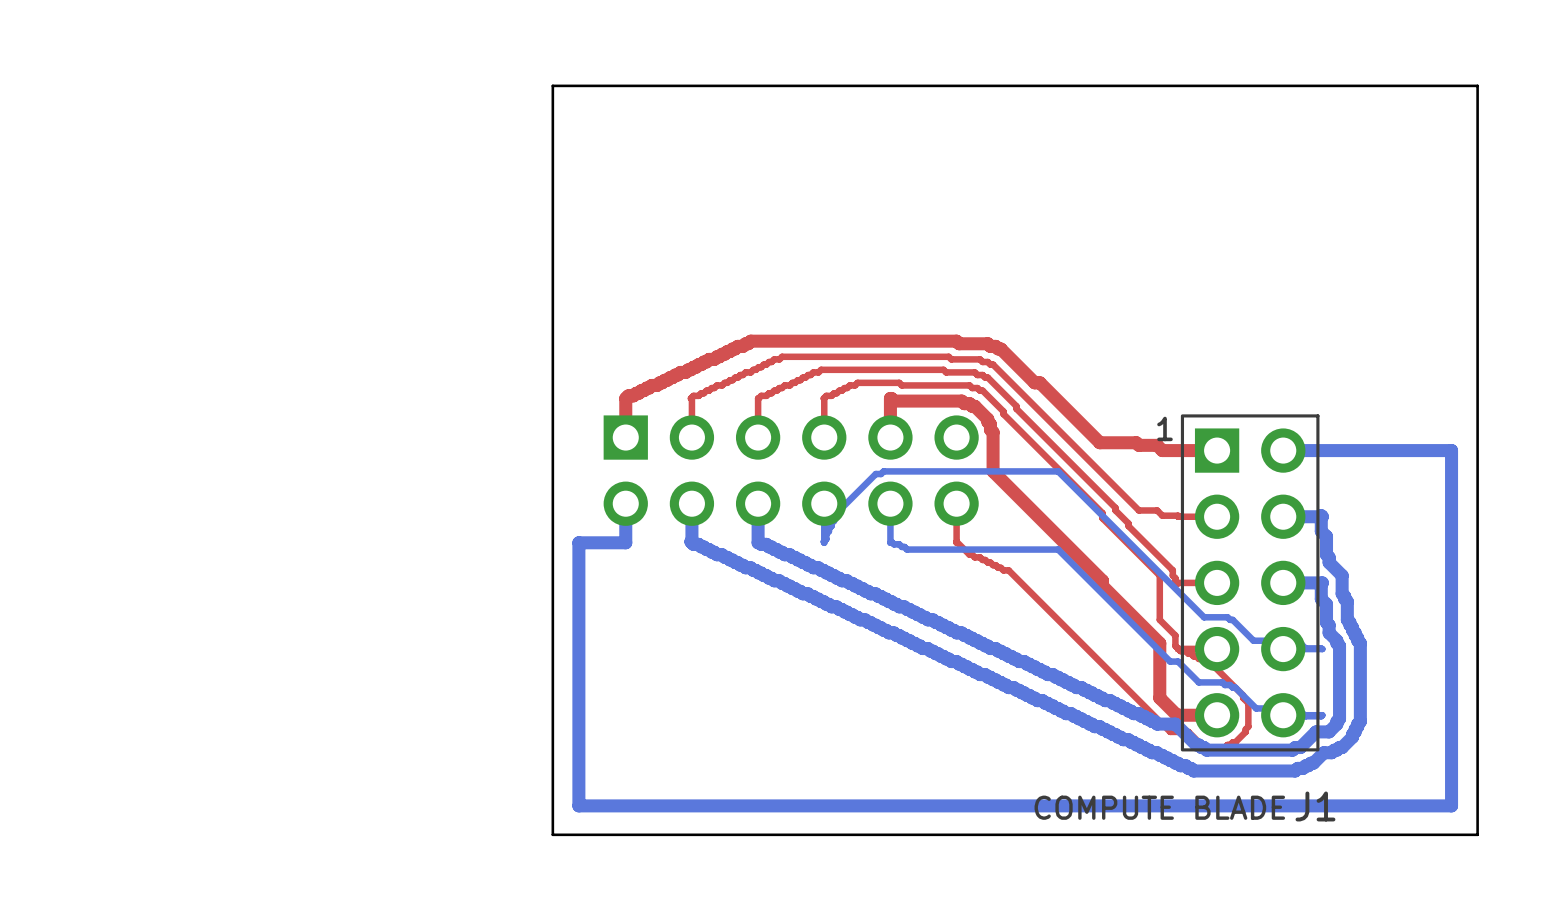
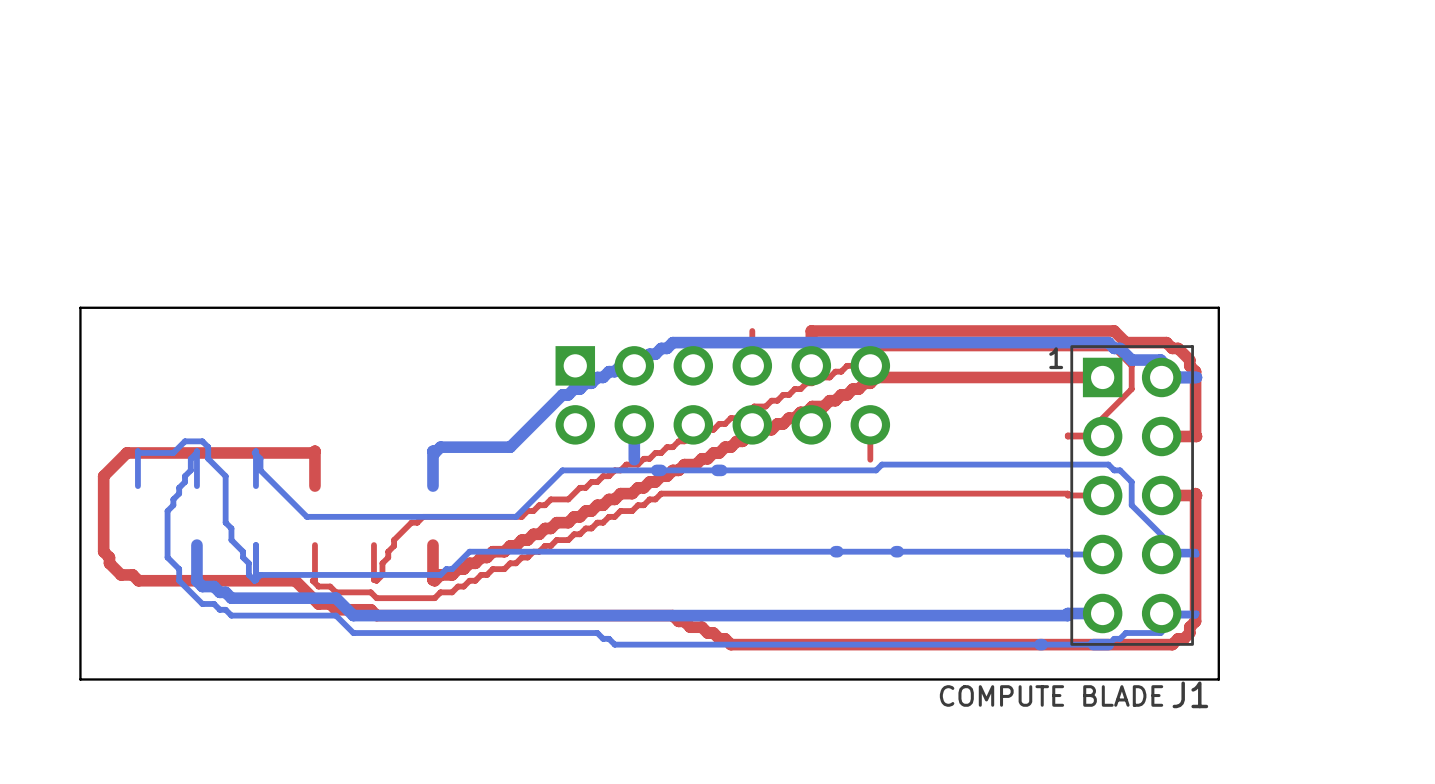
board edge: (1477, 85) (552, 85) (552, 834) (1477, 834) (1477, 85) -> none
board edge: none -> (1218, 307) (80, 307) (80, 679) (1218, 679) (1218, 307)
top track: (823, 398) (857, 382) (899, 382) (901, 385) (969, 385) (982, 390) (1003, 411) (1003, 414) (1102, 513) (1102, 518) (1159, 575) (1159, 619) (1175, 635) (1175, 645) (1180, 651) (1185, 651) (1204, 661) (1209, 661) (1243, 695) (1248, 703) (1248, 726) (1245, 731) (1235, 742) (1224, 747) (1204, 747) (1188, 731) (1170, 731) (1008, 570) (1003, 570) (980, 557) (969, 554) (956, 541) -> none
top track: (891, 398) (894, 401) (961, 401) (974, 406) (987, 419) (993, 432) (993, 471) (1102, 580) (1102, 586) (1159, 643) (1159, 698) (1178, 716) (1217, 715) -> (812, 331) (1114, 331) (1125, 342) (1166, 342) (1172, 348) (1178, 348) (1189, 360) (1189, 365) (1195, 371) (1196, 436) (1161, 436)
top track: (625, 437) (625, 398) (628, 395) (633, 395) (651, 385) (657, 385) (680, 372) (685, 372) (709, 359) (714, 359) (750, 341) (956, 341) (959, 343) (987, 343) (1000, 348) (1034, 382) (1039, 382) (1099, 442) (1136, 442) (1138, 445) (1157, 445) (1162, 450) -> (432, 545) (432, 579) (434, 580) (440, 574) (452, 574) (457, 569) (463, 569) (469, 563) (475, 563) (481, 557) (487, 557) (492, 551) (504, 551) (510, 545) (516, 545) (521, 540) (527, 540) (533, 534) (539, 534) (545, 528) (550, 528) (556, 522) (568, 522) (574, 516) (579, 516) (585, 511) (591, 511) (597, 505) (603, 505) (608, 499) (614, 499) (620, 493) (632, 493) (638, 487) (643, 487) (649, 482) (655, 482) (661, 476) (667, 476) (672, 470) (678, 470) (684, 464) (696, 464) (701, 458) (707, 458) (713, 452) (719, 452) (725, 447) (730, 447) (736, 441) (742, 441) (748, 435) (759, 435) (765, 429) (771, 429) (777, 423) (783, 423) (789, 418) (794, 418) (800, 412) (806, 412) (812, 406) (823, 406) (829, 400) (835, 400) (841, 394) (847, 394) (852, 389) (858, 389) (864, 383) (870, 383) (876, 377) (1053, 377)
top track: (691, 437) (690, 398) (693, 395) (698, 395) (716, 385) (722, 385) (745, 372) (750, 372) (782, 356) (948, 356) (951, 359) (980, 359) (993, 364) (1138, 510) (1157, 510) (1162, 515) (1178, 515) -> (373, 545) (373, 579) (376, 580) (382, 574) (382, 563) (388, 557) (388, 551) (394, 545) (394, 540) (411, 522) (417, 522) (423, 516) (521, 516) (527, 511) (533, 511) (539, 505) (545, 505) (550, 499) (568, 499) (579, 487) (585, 487) (591, 482) (597, 482) (603, 476) (608, 476) (614, 470) (620, 470) (626, 464) (638, 464) (643, 458) (649, 458) (655, 452) (661, 452) (667, 447) (672, 447) (678, 441) (684, 441) (690, 435) (701, 435) (707, 429) (713, 429) (719, 423) (725, 423) (730, 418) (736, 418) (742, 412) (748, 412) (754, 406) (765, 406) (771, 400) (777, 400) (783, 394) (789, 394) (794, 389) (800, 389) (806, 383) (812, 383) (818, 377) (829, 377) (835, 371) (841, 371) (847, 365) (852, 365) (858, 360) (864, 360) (870, 354) (876, 354) (881, 348) (1114, 348) (1131, 365) (1131, 389) (1085, 435) (1067, 435)
top track: (758, 437) (758, 398) (821, 369) (943, 369) (946, 372) (974, 372) (977, 375) (982, 375) (987, 377) (1115, 507) (1115, 510) (1128, 523) (1128, 526) (1172, 570) (1172, 575) (1178, 582) -> (314, 545) (314, 579) (312, 580) (318, 586) (330, 586) (335, 592) (370, 592) (376, 598) (434, 598) (440, 592) (452, 592) (457, 586) (463, 586) (469, 580) (475, 580) (481, 574) (487, 574) (492, 569) (504, 569) (510, 563) (516, 563) (521, 557) (527, 557) (533, 551) (539, 551) (545, 545) (550, 545) (556, 540) (568, 540) (574, 534) (579, 534) (585, 528) (591, 528) (597, 522) (603, 522) (608, 516) (614, 516) (620, 511) (632, 511) (638, 505) (643, 505) (649, 499) (655, 499) (661, 493) (1067, 493) (1067, 495)
bottom track: none -> (1178, 377) (1160, 360) (1131, 360) (1120, 348) (1114, 348) (1108, 342) (672, 342) (667, 348) (661, 348) (655, 354) (649, 354) (643, 360) (638, 360) (632, 365) (620, 365) (614, 371) (608, 371) (603, 377) (597, 377) (591, 383) (585, 383) (579, 389) (574, 389) (568, 394) (562, 394) (510, 447) (440, 447) (434, 452) (432, 451) (432, 486)
bottom track: (1322, 450) (1451, 450) (1451, 805) (578, 805) (578, 542) (625, 542) (625, 503) -> none
bottom track: (758, 503) (758, 542) (766, 544) (784, 554) -> (661, 470) (717, 470)
bottom track: (824, 503) (824, 542) (826, 533) (836, 513) (875, 474) (881, 474) (883, 471) (1058, 471) (1204, 617) (1227, 617) (1232, 619) (1253, 640) (1279, 640) (1282, 643) (1300, 643) (1305, 648) (1322, 649) -> (721, 470) (876, 470) (881, 464) (1108, 464) (1114, 470) (1120, 470) (1131, 482) (1131, 505) (1178, 551) (1195, 551) (1196, 554)
bottom track: (890, 503) (890, 542) (899, 544) (907, 549) (1058, 549) (1170, 661) (1178, 661) (1198, 682) (1222, 682) (1224, 685) (1230, 685) (1235, 687) (1256, 708) (1300, 711) (1305, 716) (1322, 715) -> none
bottom track: (1283, 516) (1322, 516) (1321, 531) (1326, 536) (1326, 554) (1329, 557) (1329, 562) (1342, 575) (1342, 593) (1347, 601) (1347, 619) (1360, 643) (1360, 721) (1352, 737) (1342, 747) (1331, 752) (1323, 752) (1313, 763) (1295, 770) (1193, 770) (1149, 750) -> (1093, 644) (1042, 644)
bottom track: (690, 541) (716, 554) -> (255, 486) (255, 451) (254, 452) (260, 458) (260, 470) (306, 516) (516, 516) (562, 470) (656, 470)
bottom track: (722, 554) (745, 567) (750, 567) (774, 580) (779, 580) (831, 606) (836, 606) (860, 619) (865, 619) (917, 645) -> (254, 580) (260, 574) (440, 574) (446, 569) (452, 569) (469, 551) (835, 551)
bottom track: (789, 554) (841, 580) (847, 580) (899, 606) (904, 606) (956, 632) (961, 632) (985, 645) -> (837, 551) (895, 551)
bottom track: none -> (137, 486) (137, 451) (138, 452) (173, 452) (184, 441) (202, 441) (208, 447) (208, 458) (225, 476) (225, 522) (231, 528) (231, 540) (243, 551) (243, 557) (248, 563) (248, 574) (254, 580)
top track: none -> (314, 486) (314, 451) (312, 452) (126, 452) (103, 476) (103, 551) (109, 557) (109, 563) (121, 574) (132, 574) (138, 580) (295, 580) (318, 603) (330, 603) (335, 609) (370, 609) (376, 615) (672, 615) (678, 621) (684, 621) (690, 627) (701, 627) (707, 633) (713, 633) (719, 638) (725, 638) (730, 644) (1172, 644) (1178, 638) (1183, 638) (1189, 633) (1189, 627) (1195, 621) (1195, 493) (1196, 495) (1161, 495)
bottom track: (1283, 582) (1322, 582) (1321, 599) (1326, 604) (1326, 622) (1329, 625) (1329, 632) (1339, 645) (1339, 718) (1329, 731) (1316, 731) (1300, 747) (1295, 747) (1292, 750) (1223, 750) -> (1196, 613) (1195, 615) (1178, 615) (1160, 633) (1125, 633) (1120, 638) (1114, 638) (1108, 644)
bottom track: none -> (196, 545) (196, 580) (202, 586) (214, 586) (219, 592) (225, 592) (231, 598) (335, 598) (353, 615) (1067, 615) (1067, 613) (1102, 613)
bottom track: none -> (255, 545) (254, 580)
bottom track: (920, 645) (951, 661) (956, 661) (980, 674) (985, 674) (1008, 687) (1013, 687) (1037, 700) (1042, 700) (1066, 713) (1071, 713) (1094, 726) (1099, 726) (1123, 739) (1128, 739) (1146, 750) -> (196, 486) (196, 451) (190, 458) (190, 470) (184, 476) (184, 482) (179, 487) (179, 493) (173, 499) (173, 505) (167, 511) (167, 557) (179, 569) (179, 580) (202, 603) (214, 603) (219, 609) (225, 609) (231, 615) (335, 615) (353, 633) (597, 633) (603, 638) (608, 638) (614, 644) (1039, 644)
bottom track: (987, 645) (1019, 661) (1024, 661) (1047, 674) (1052, 674) (1076, 687) (1081, 687) (1105, 700) (1110, 700) (1133, 713) (1138, 713) (1157, 724) (1175, 724) (1196, 744) (1206, 750) -> (898, 551) (1067, 551) (1067, 554) (1102, 554)

